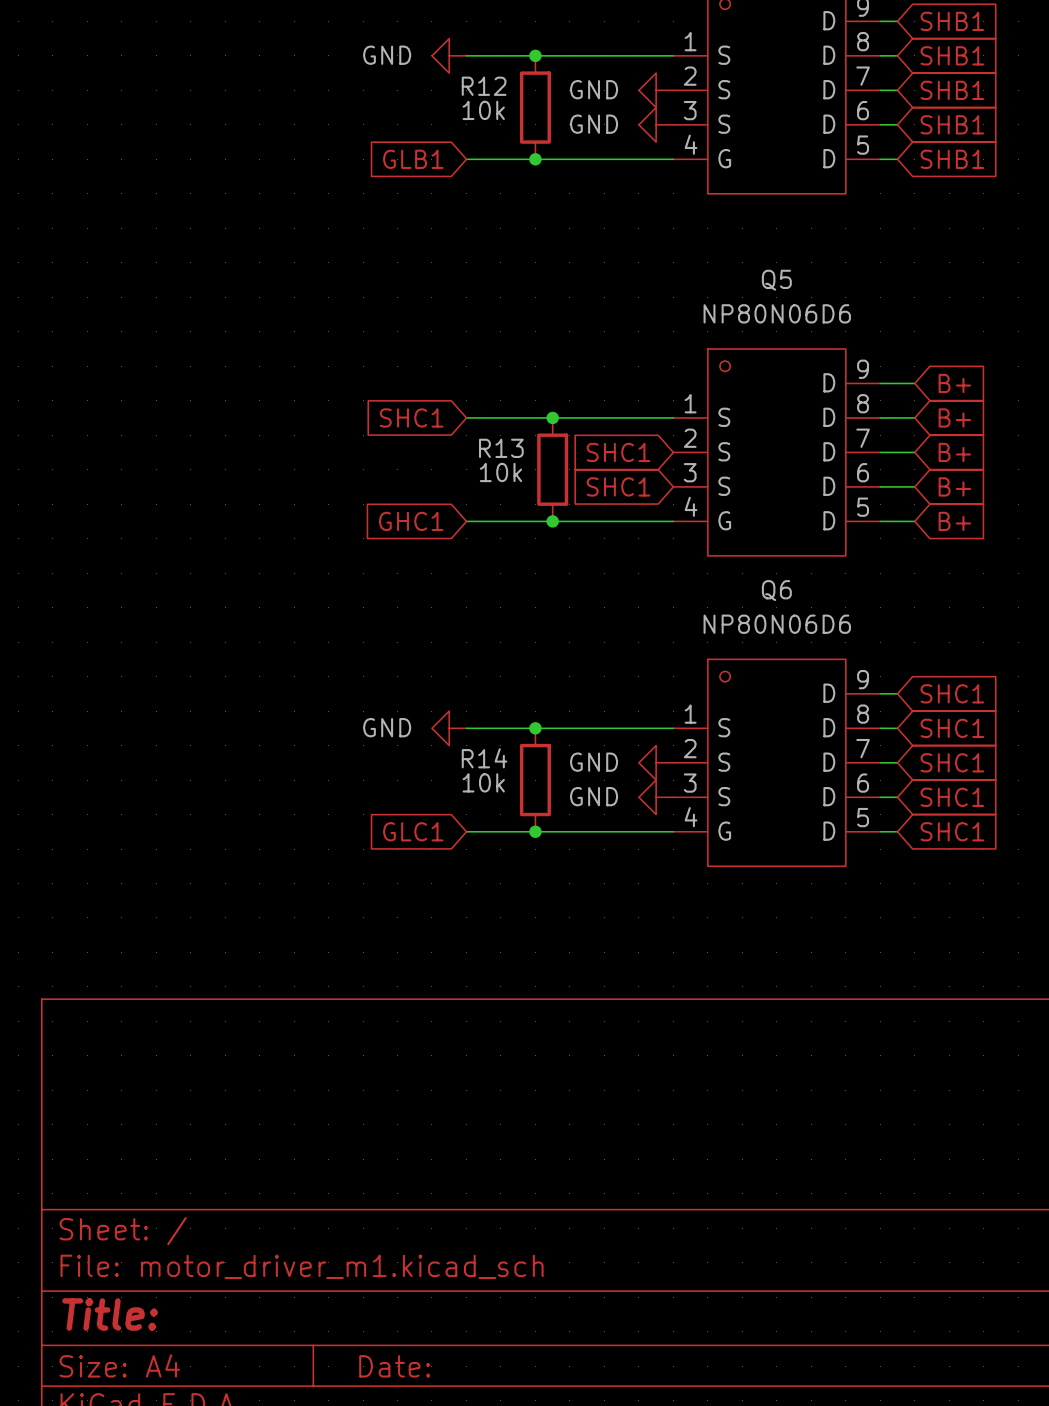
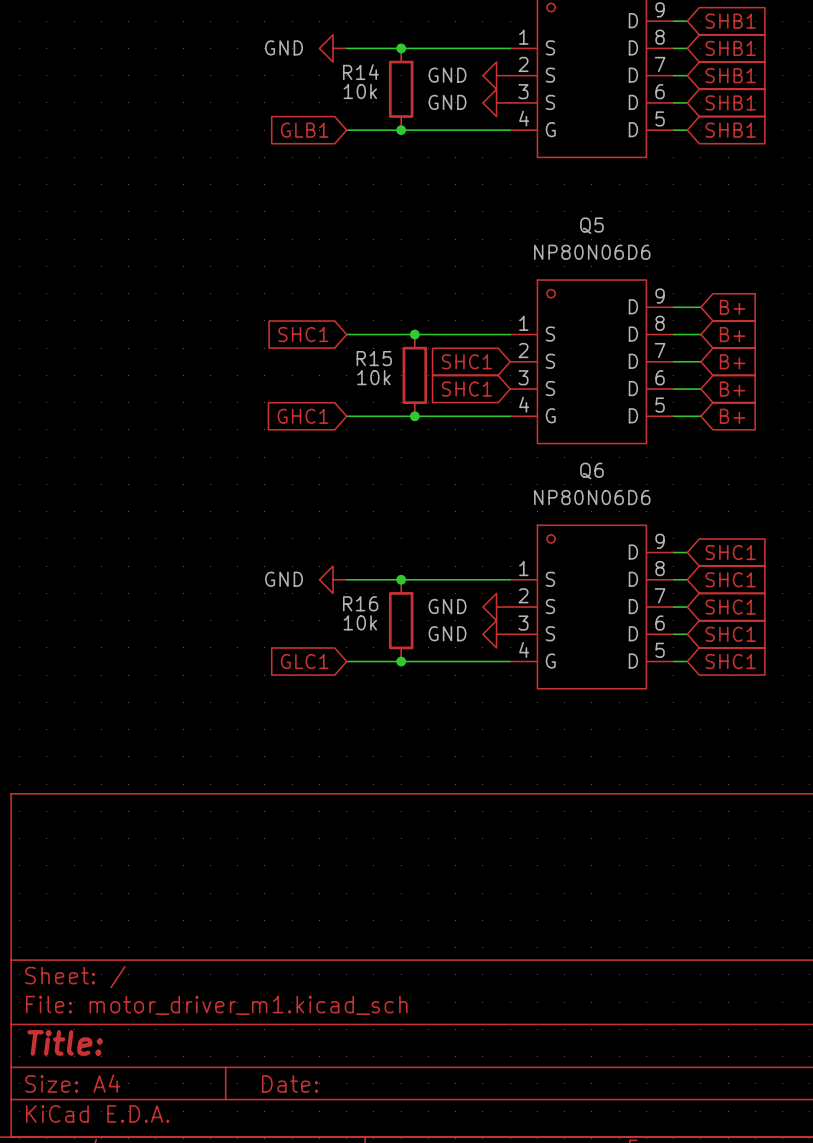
R12 name: R12 (484, 86) -> R14 (360, 72)
R13 name: R13 (501, 448) -> R15 (374, 358)
R14 name: R14 (484, 758) -> R16 (360, 603)

